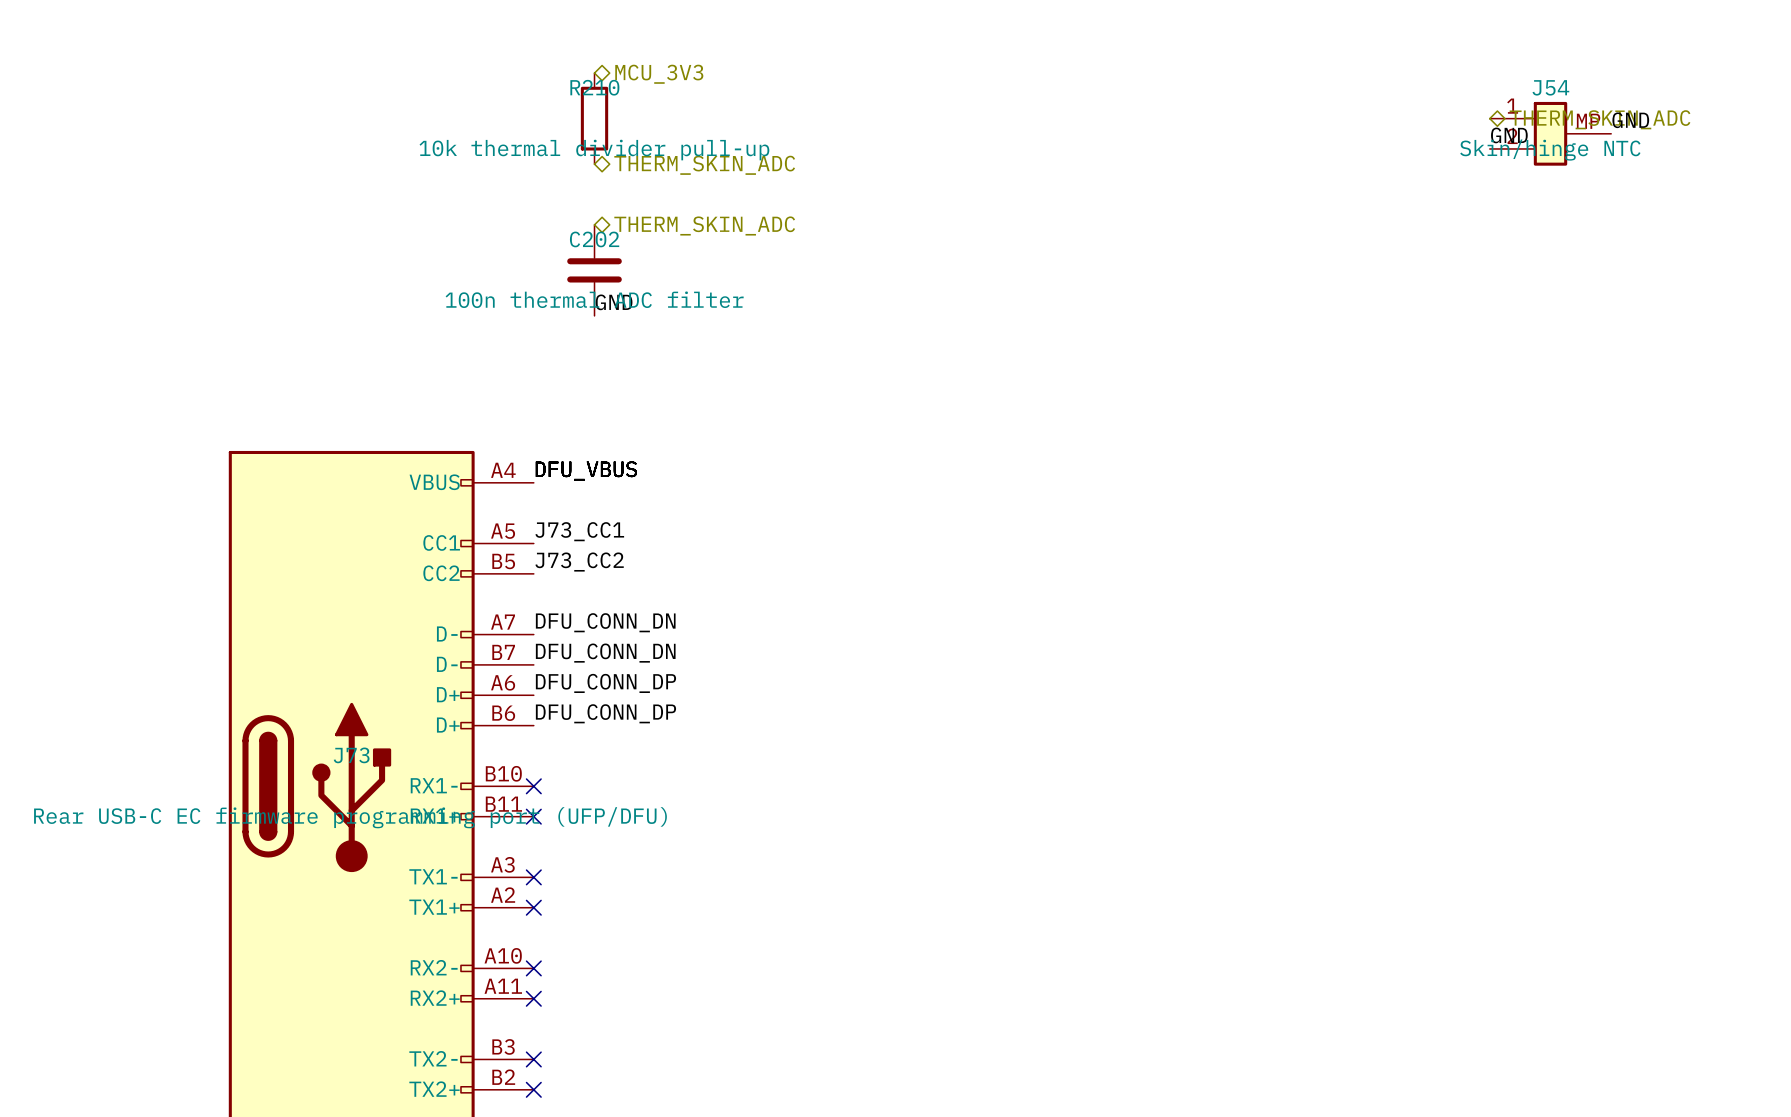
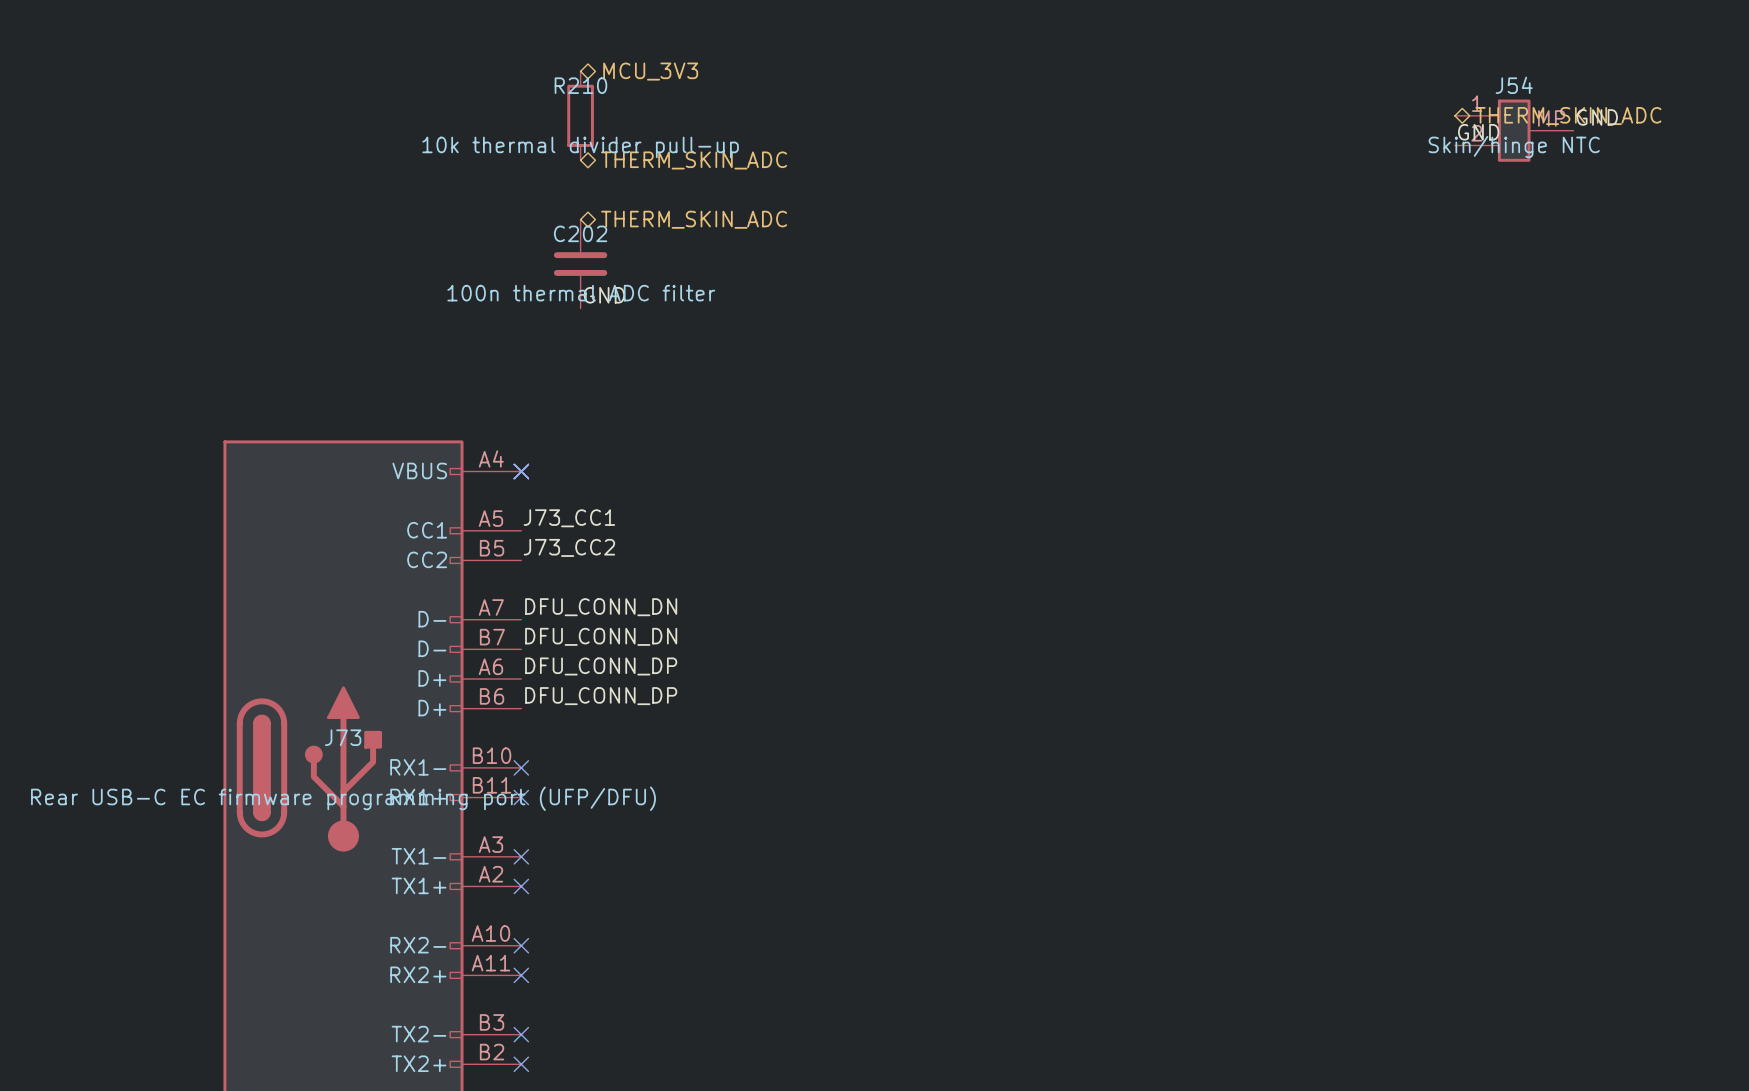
label: DFU_VBUS (586, 470) -> none
no-connect mark: none -> (521, 471)

